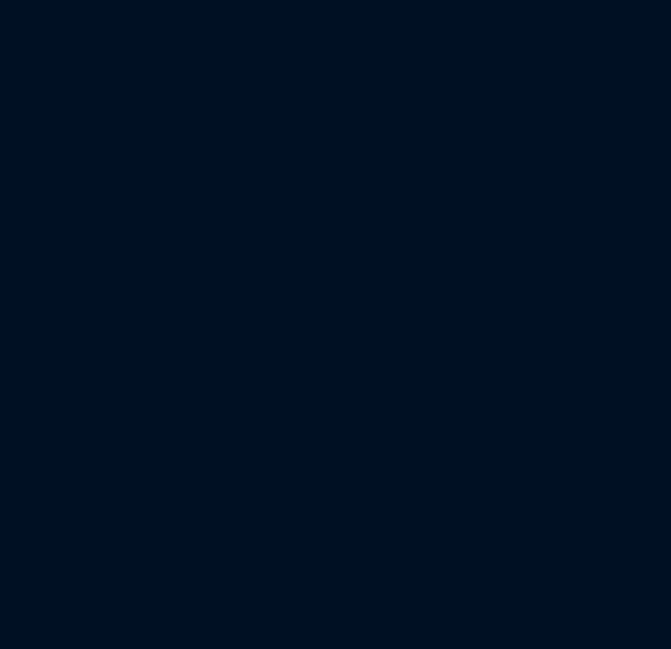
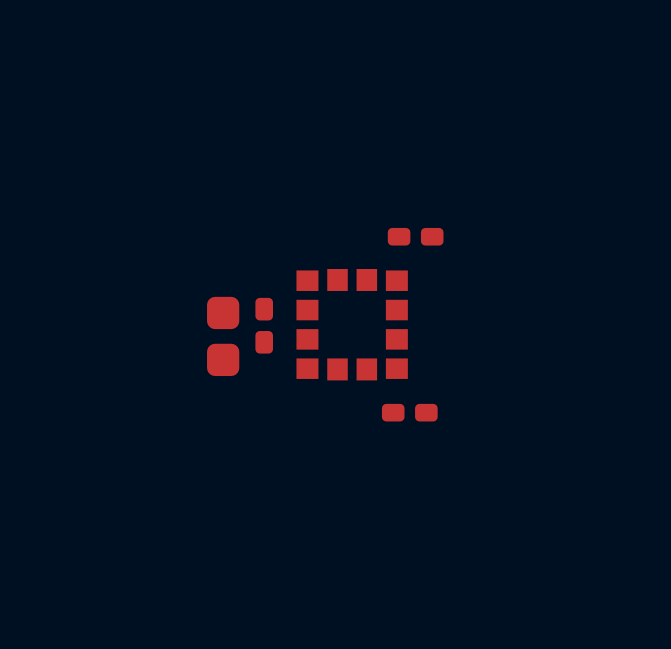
part: none -> (415, 236)
part: none -> (352, 324)
part: none -> (264, 325)
part: none -> (223, 336)
part: none -> (409, 412)

